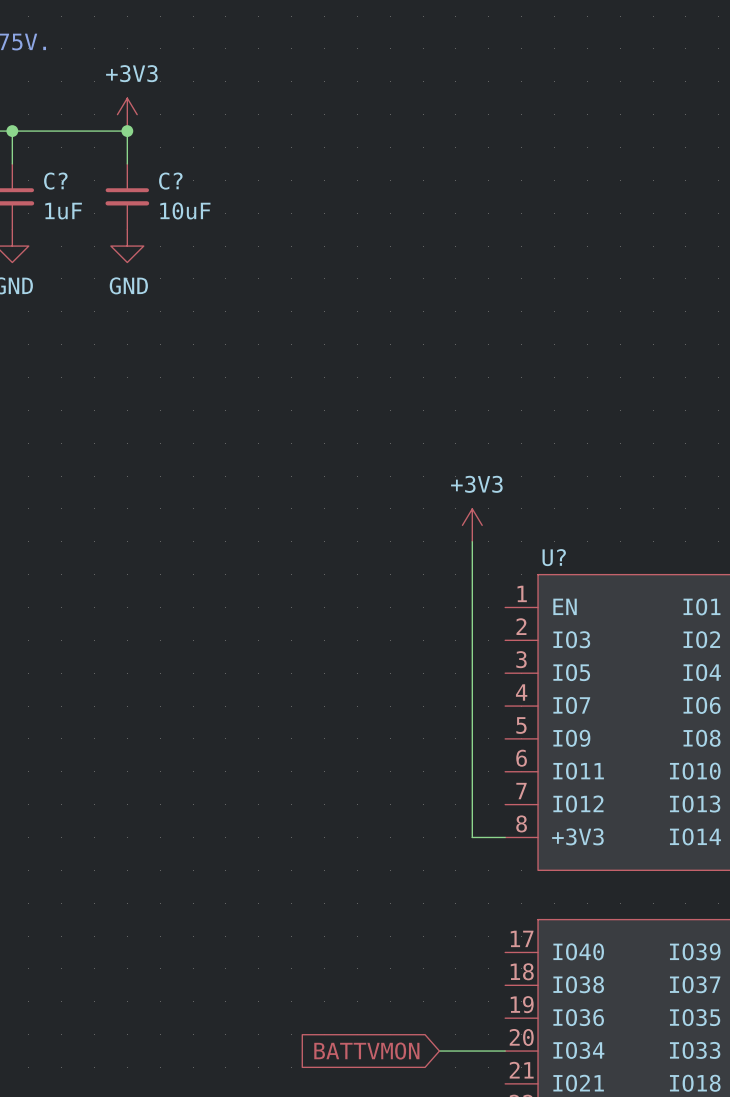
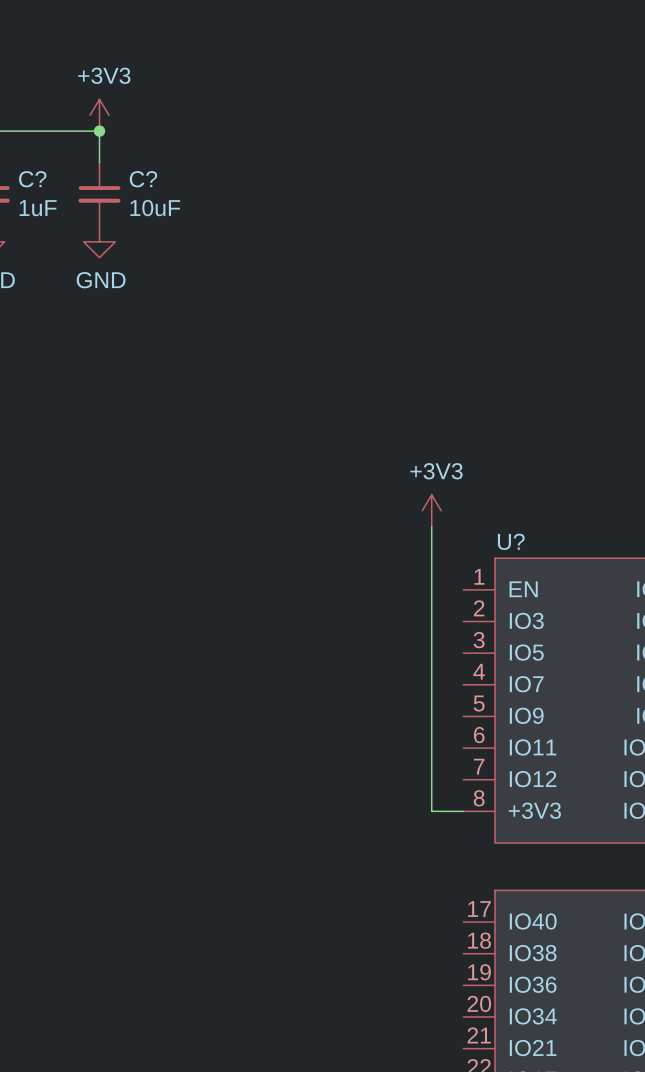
global label: BATTVMON (366, 1051) -> none
wire: (439, 1051) (505, 1051) -> none

